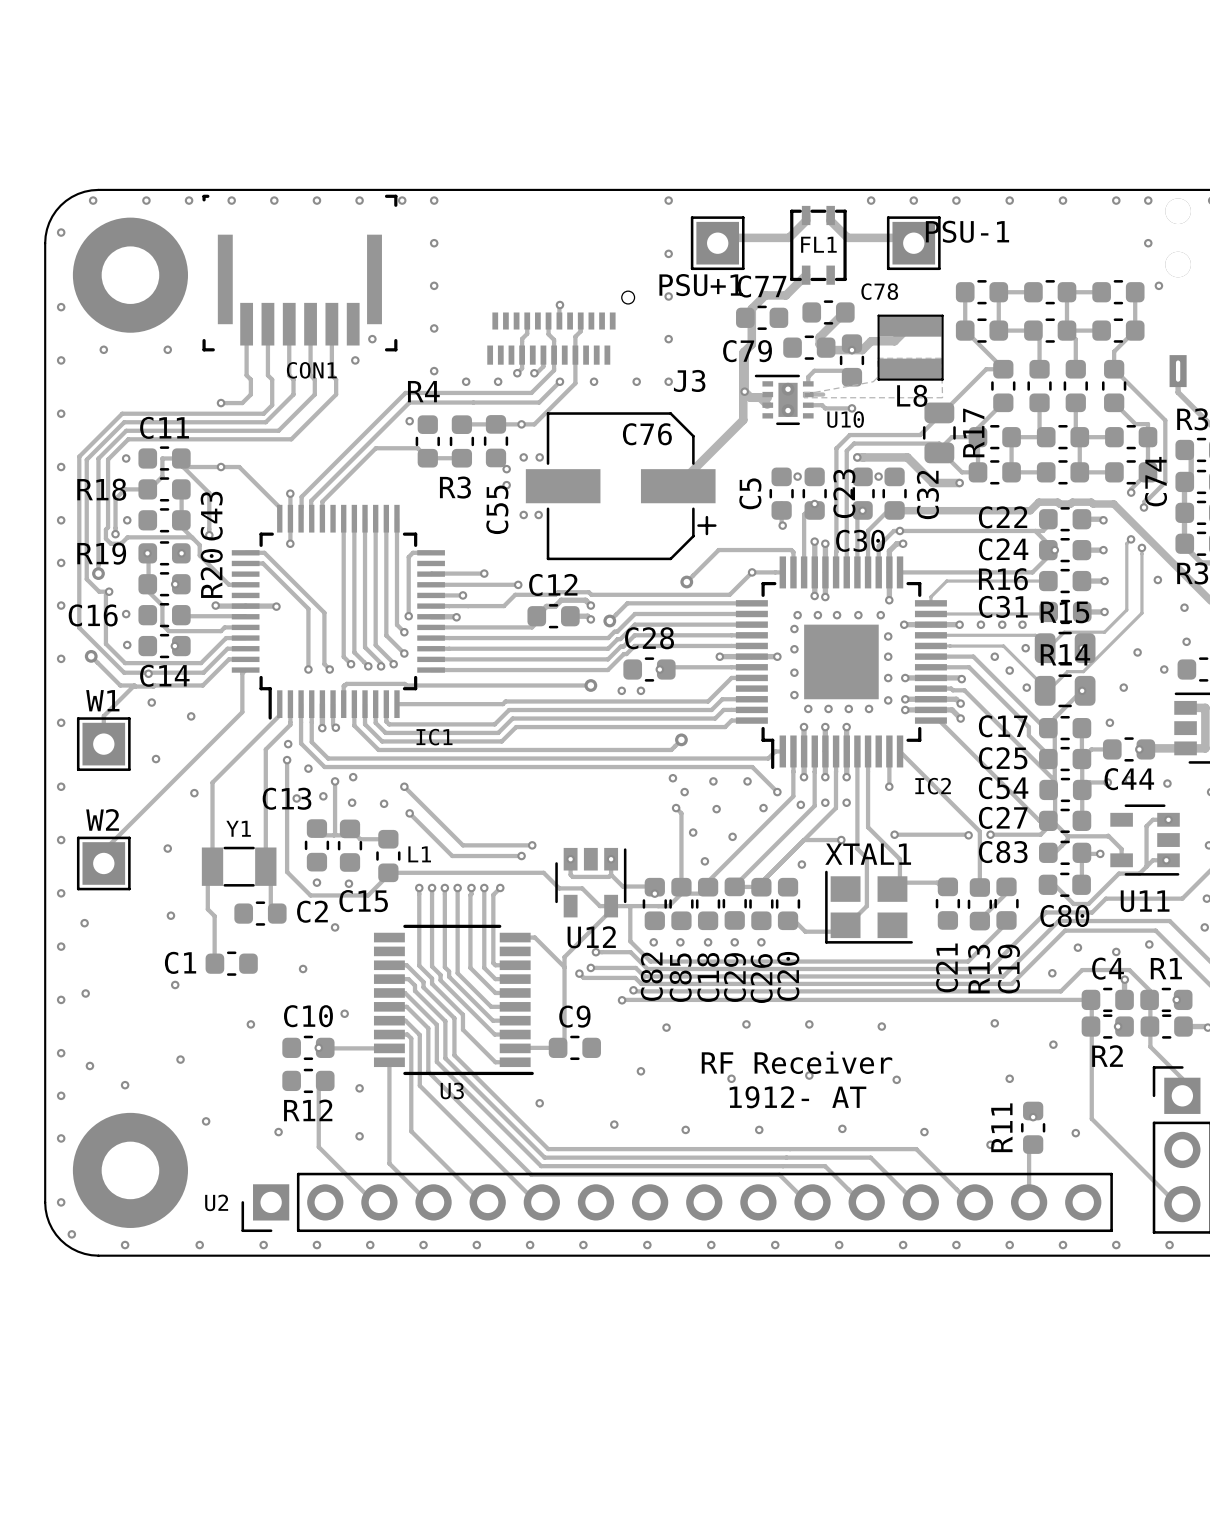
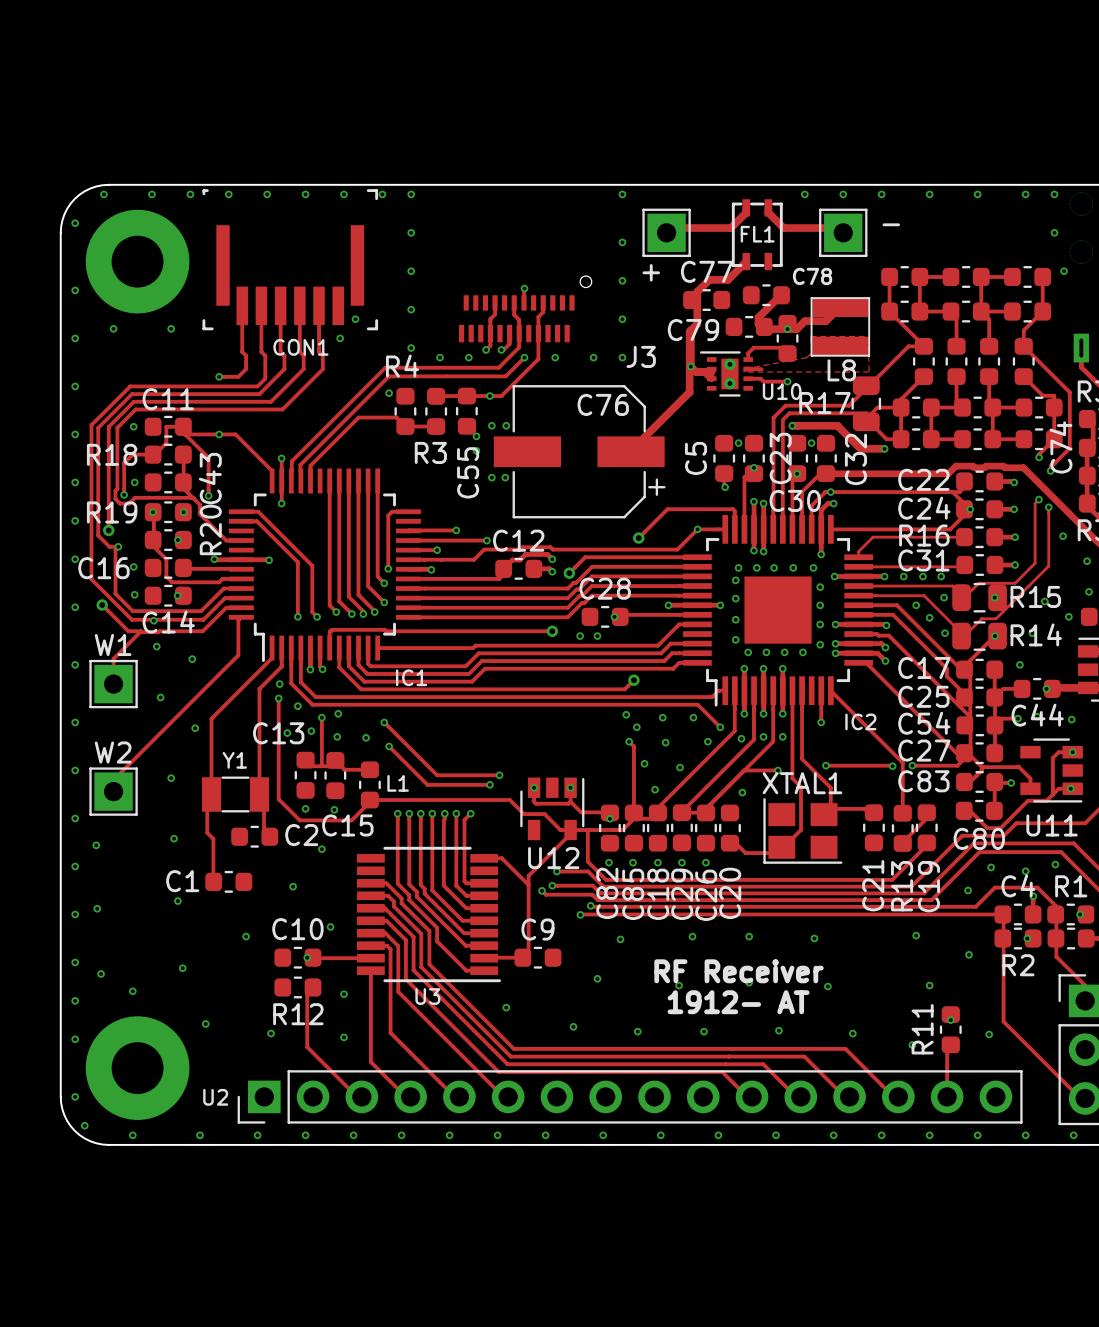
PSU-1 name: PSU-1 (967, 231) -> - (891, 224)
PSU+1 name: PSU+1 (701, 285) -> + (651, 272)
R17 name rotation: 0° (973, 432) -> 90° clockwise (824, 403)
R17 name position: R17 (973, 432) -> R17 (824, 403)
R15 name position: R15 (1064, 612) -> R15 (1035, 596)
R14 name position: R14 (1065, 654) -> R14 (1036, 634)

